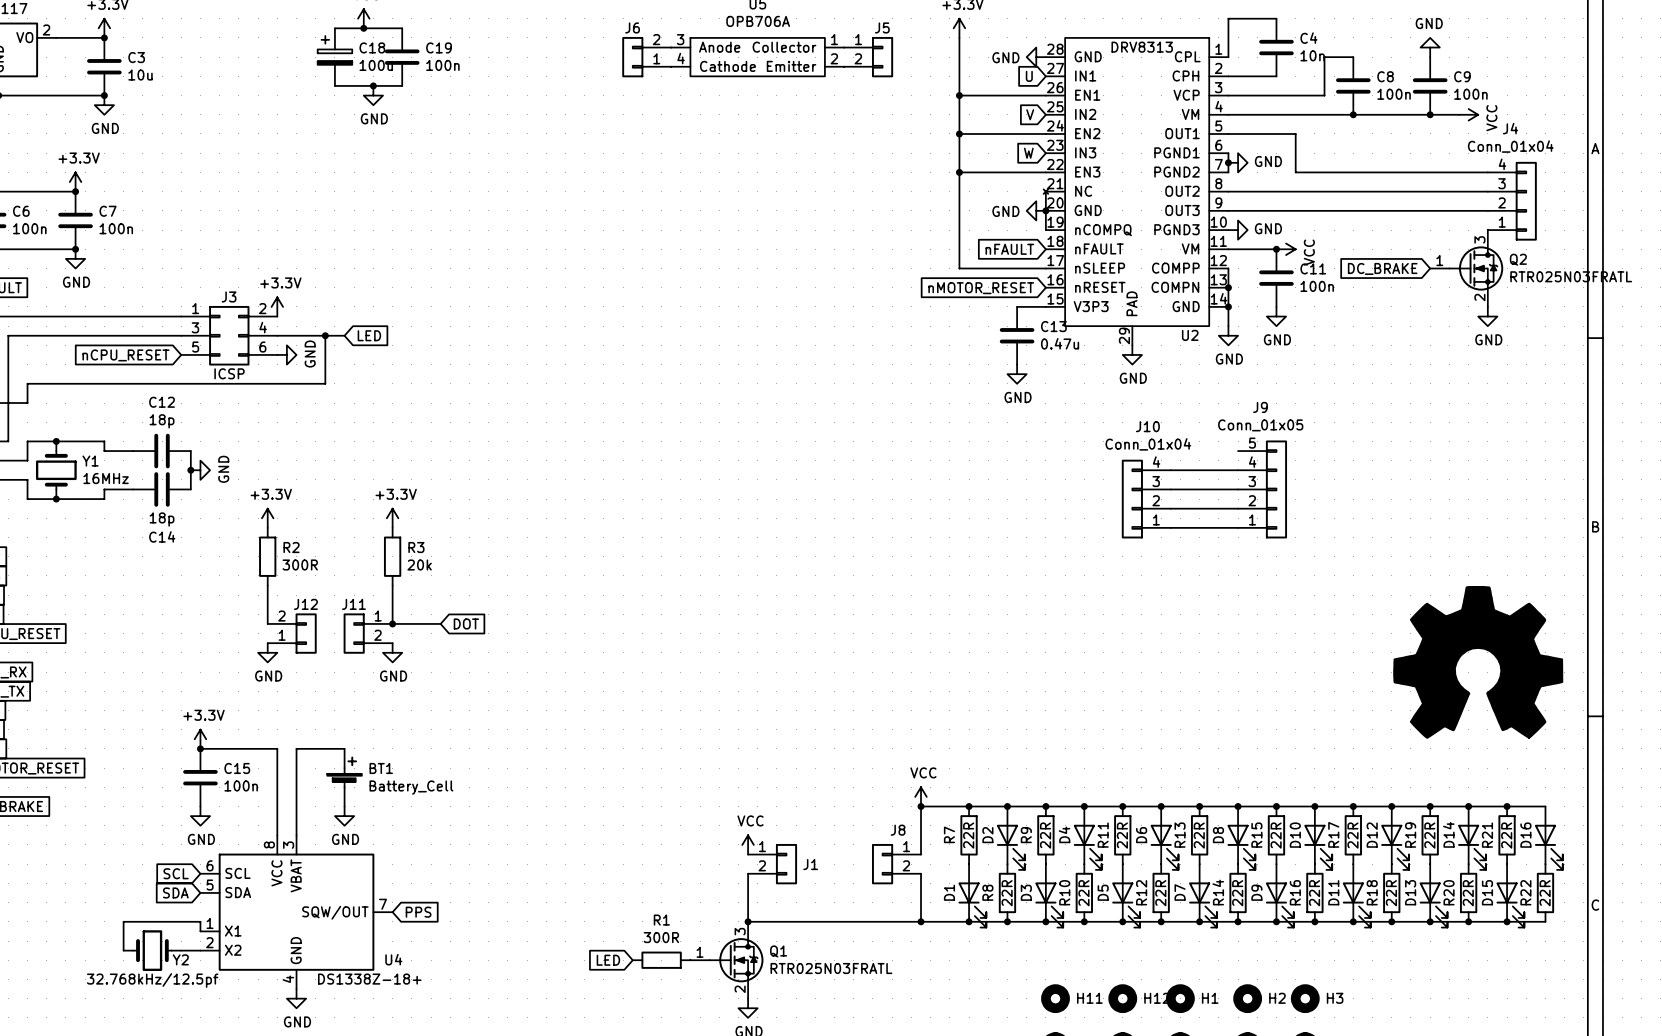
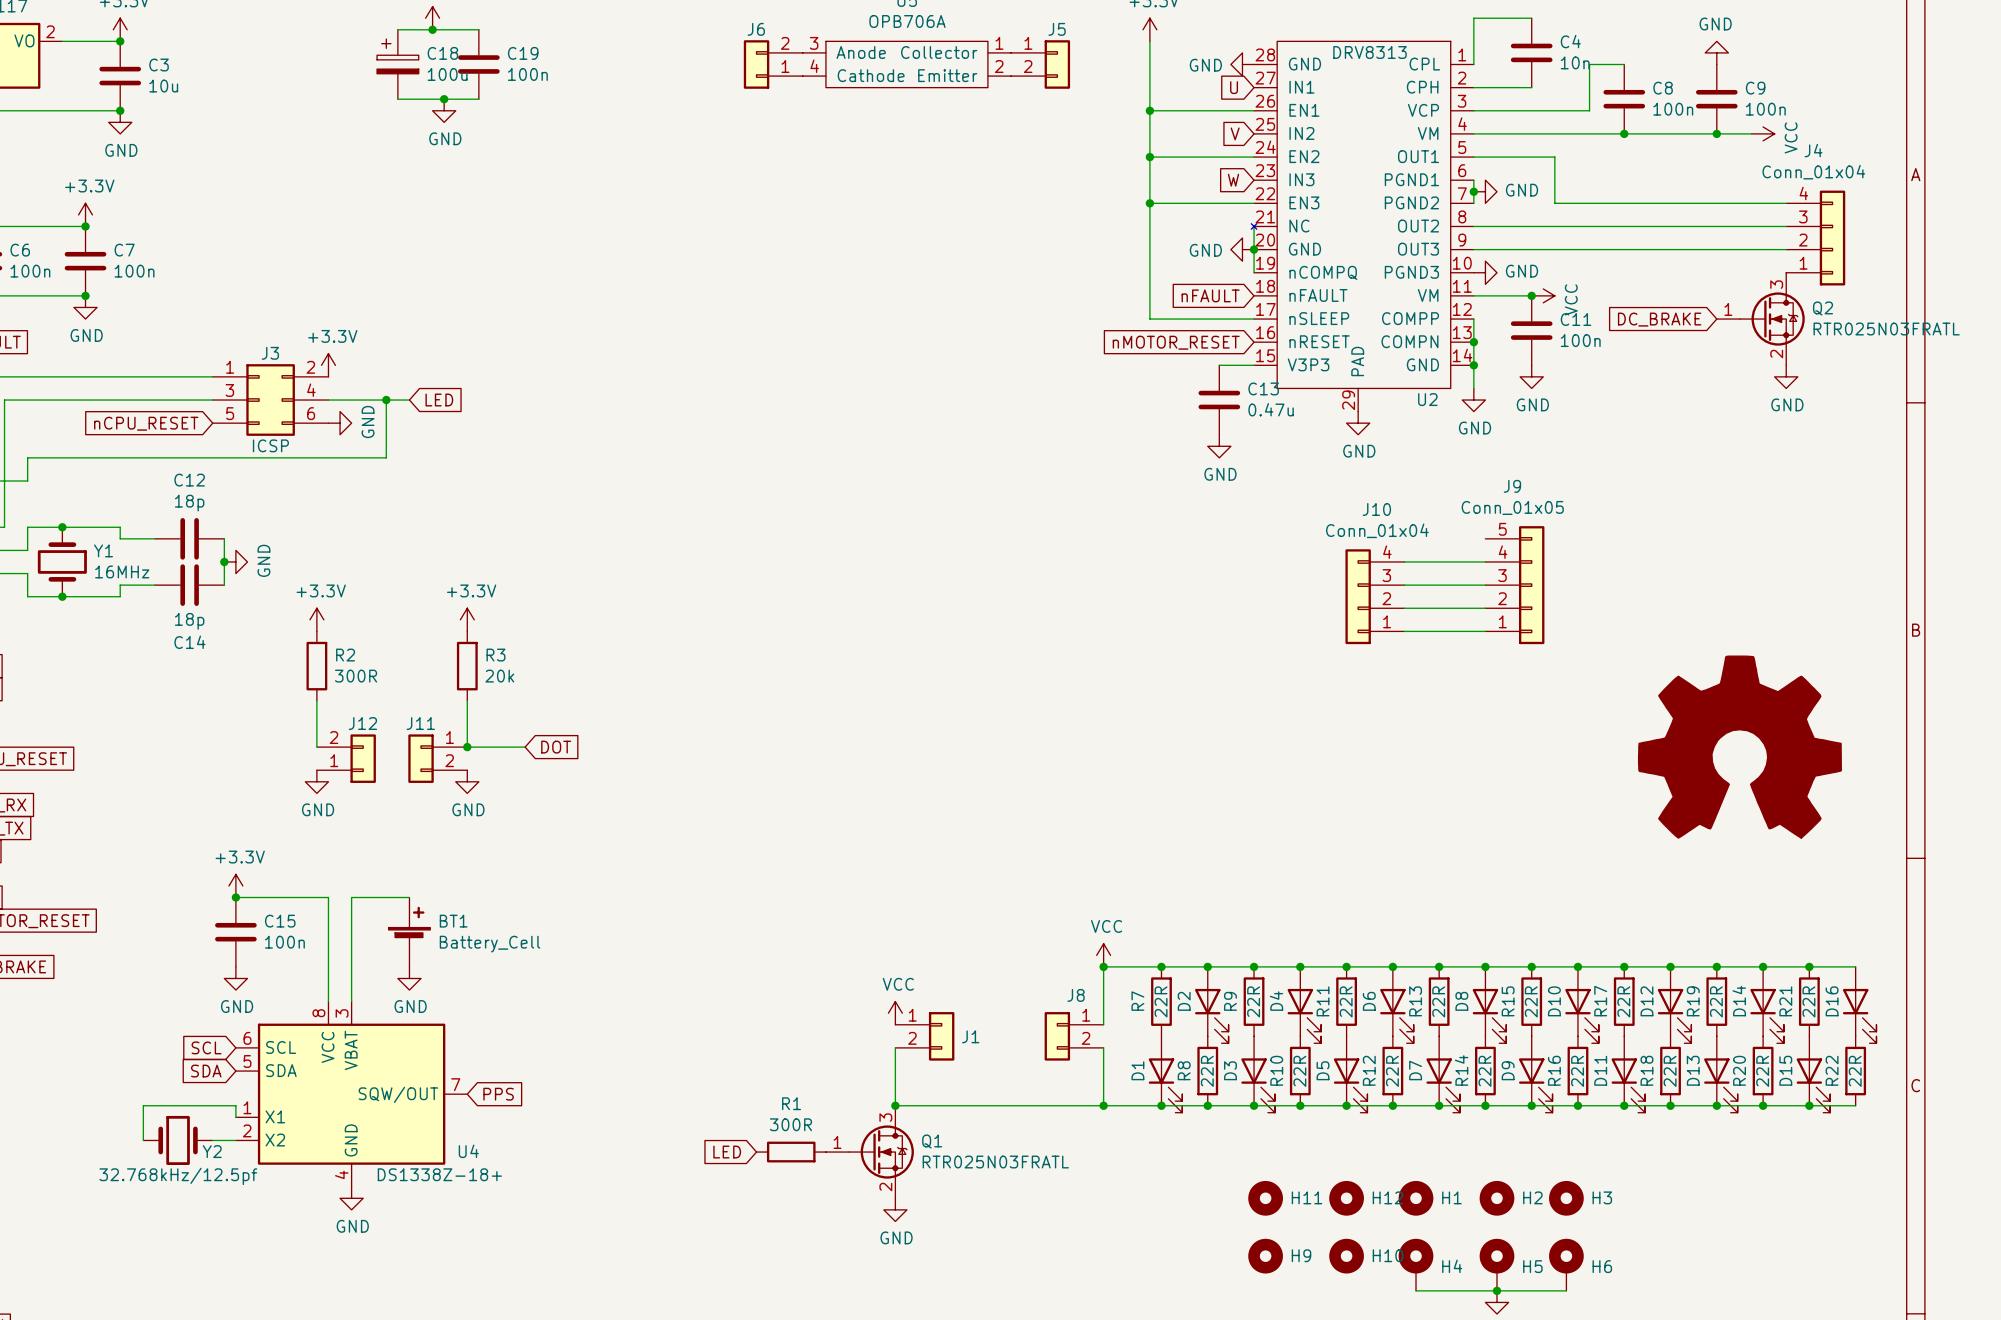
power symbol position: (1478, 662) -> (1739, 747)

